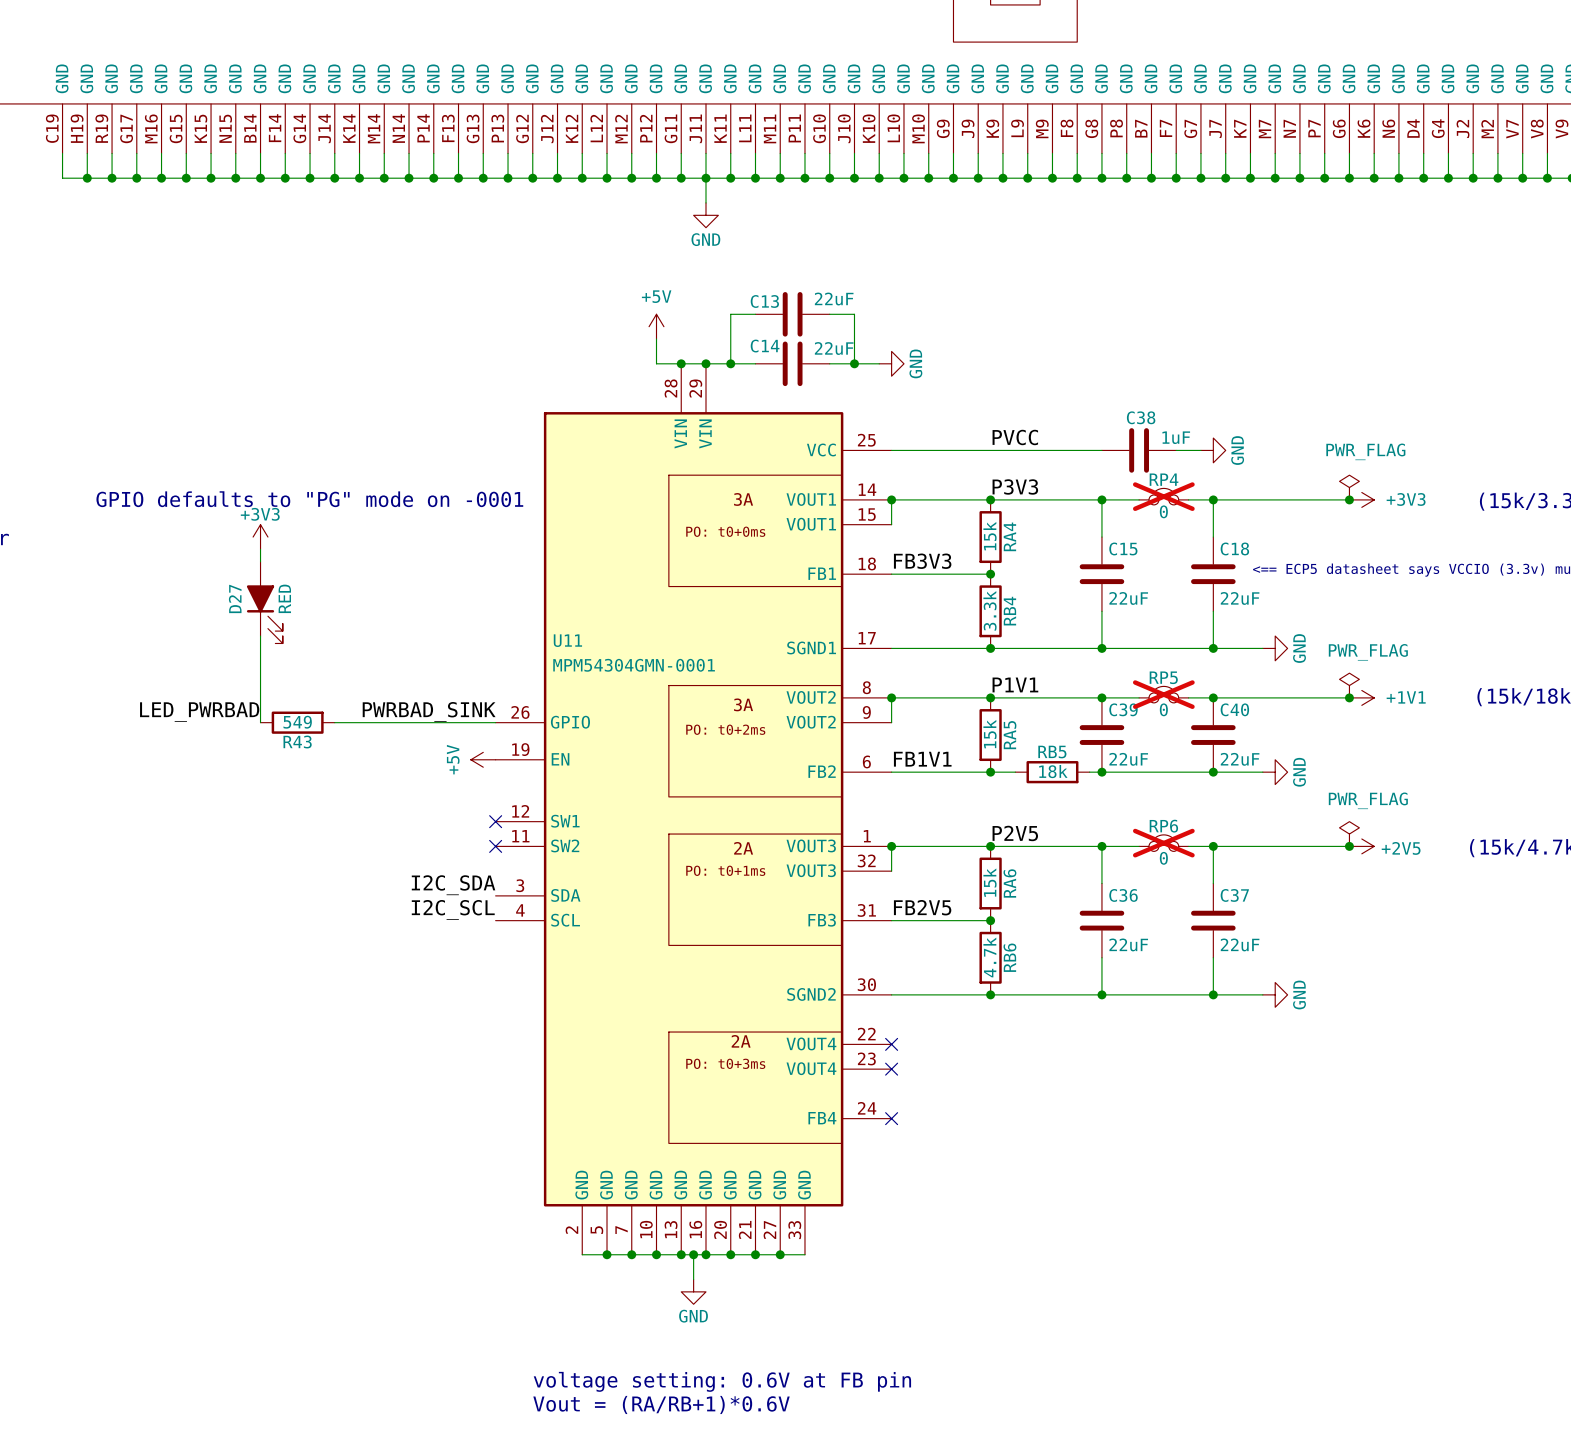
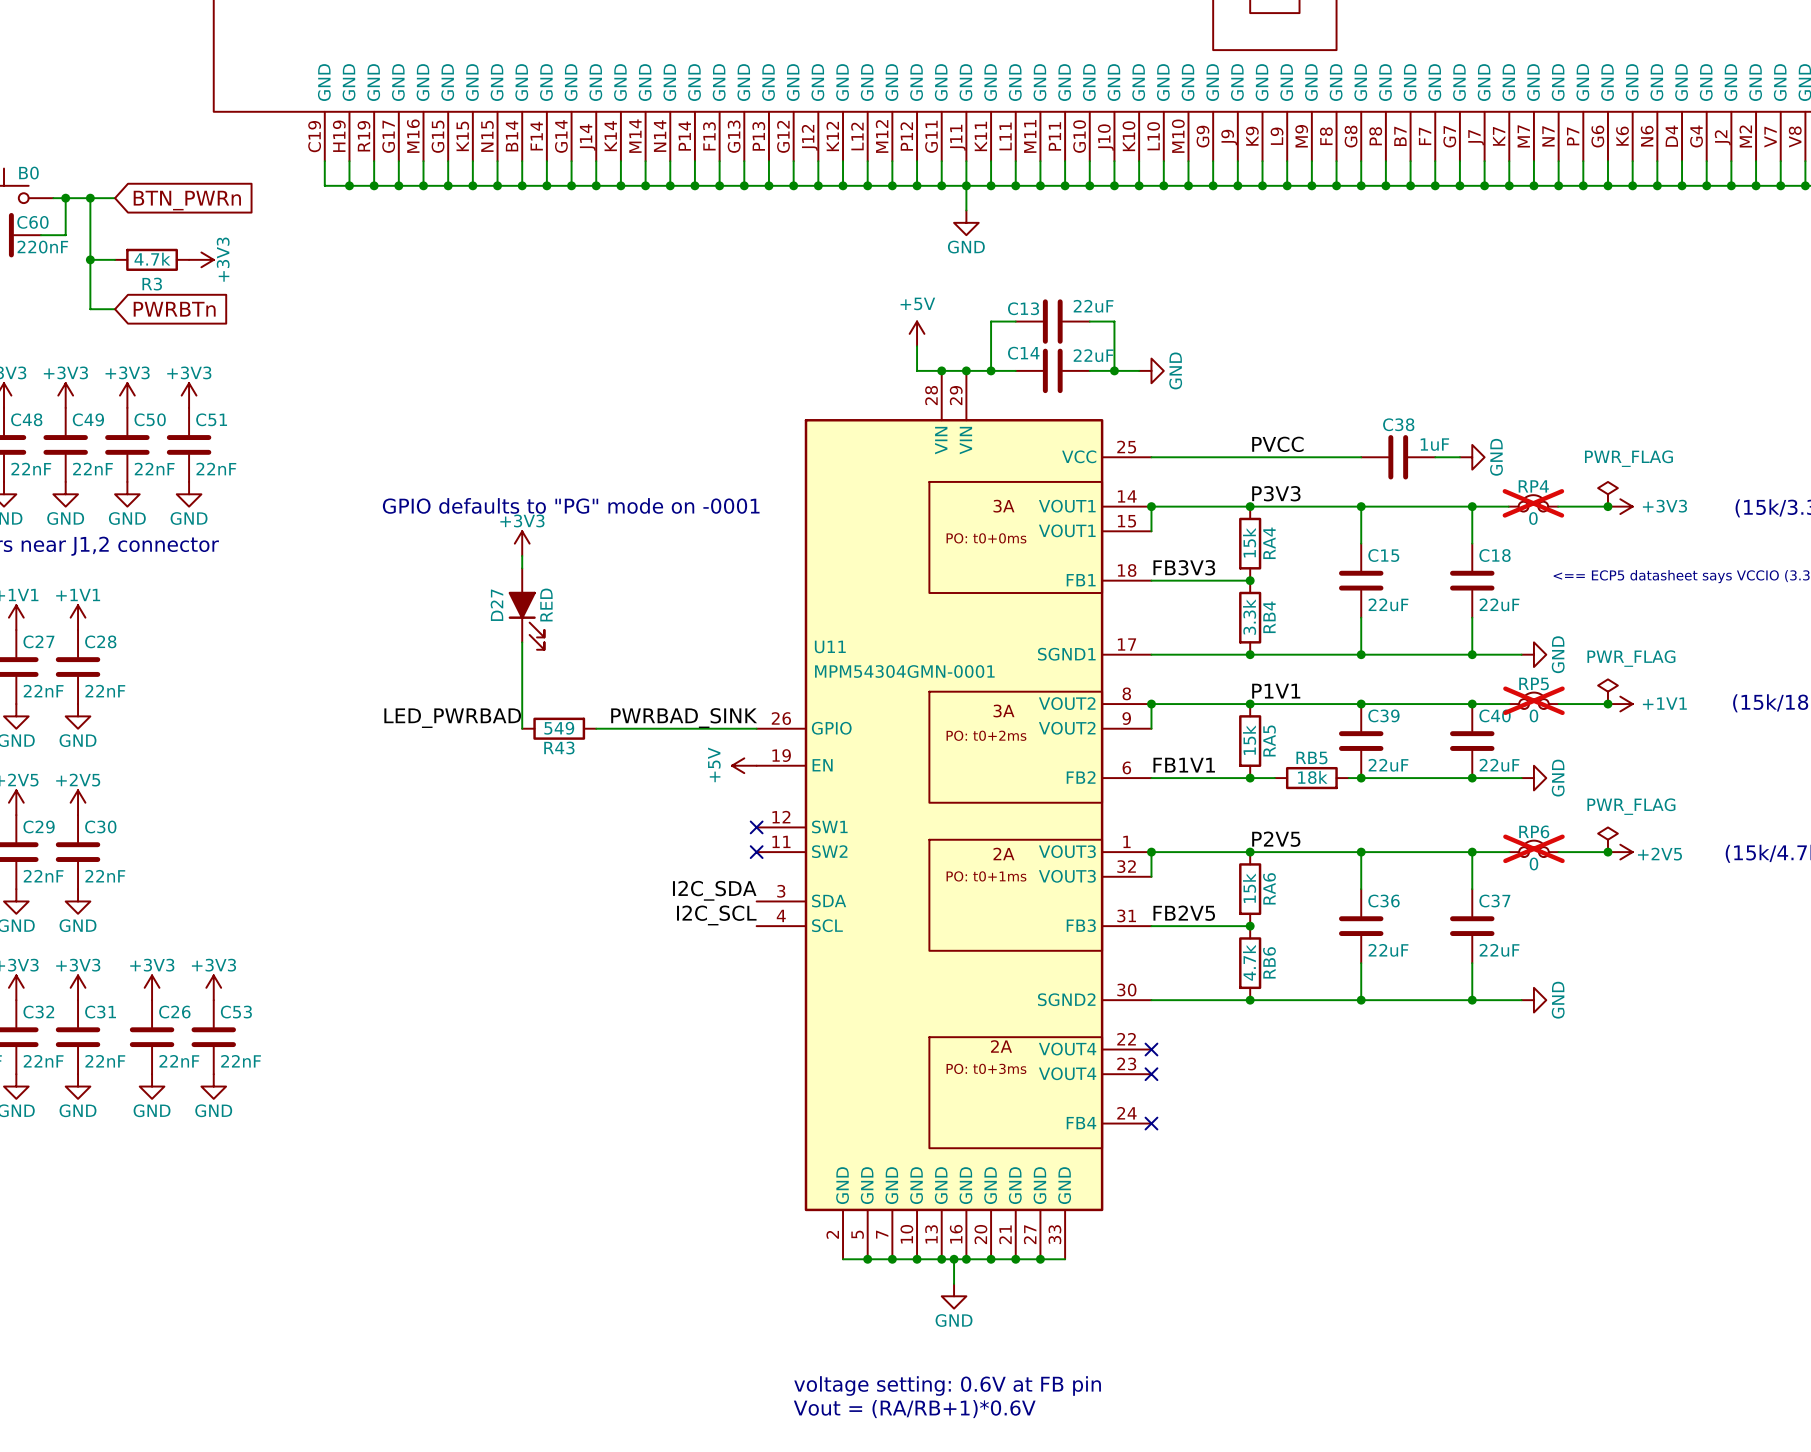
RP4 position: (1163, 496) -> (1533, 503)
RP5 position: (1163, 694) -> (1533, 700)
RP6 position: (1163, 843) -> (1533, 848)

